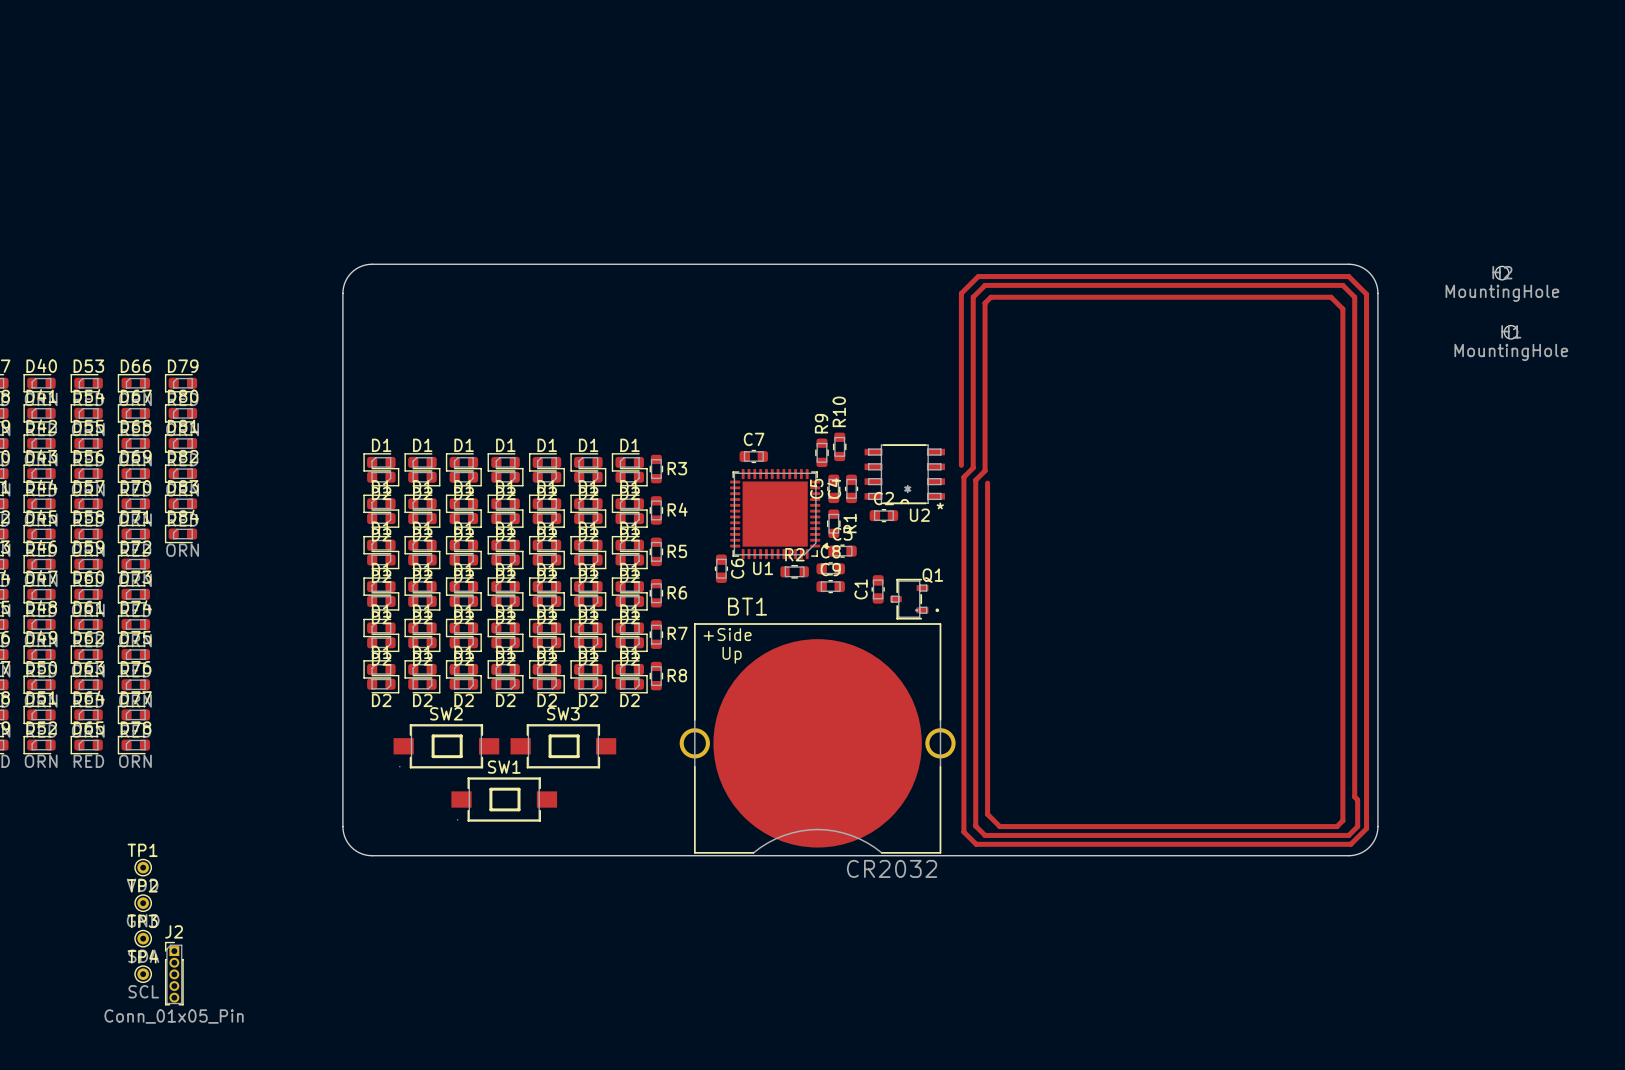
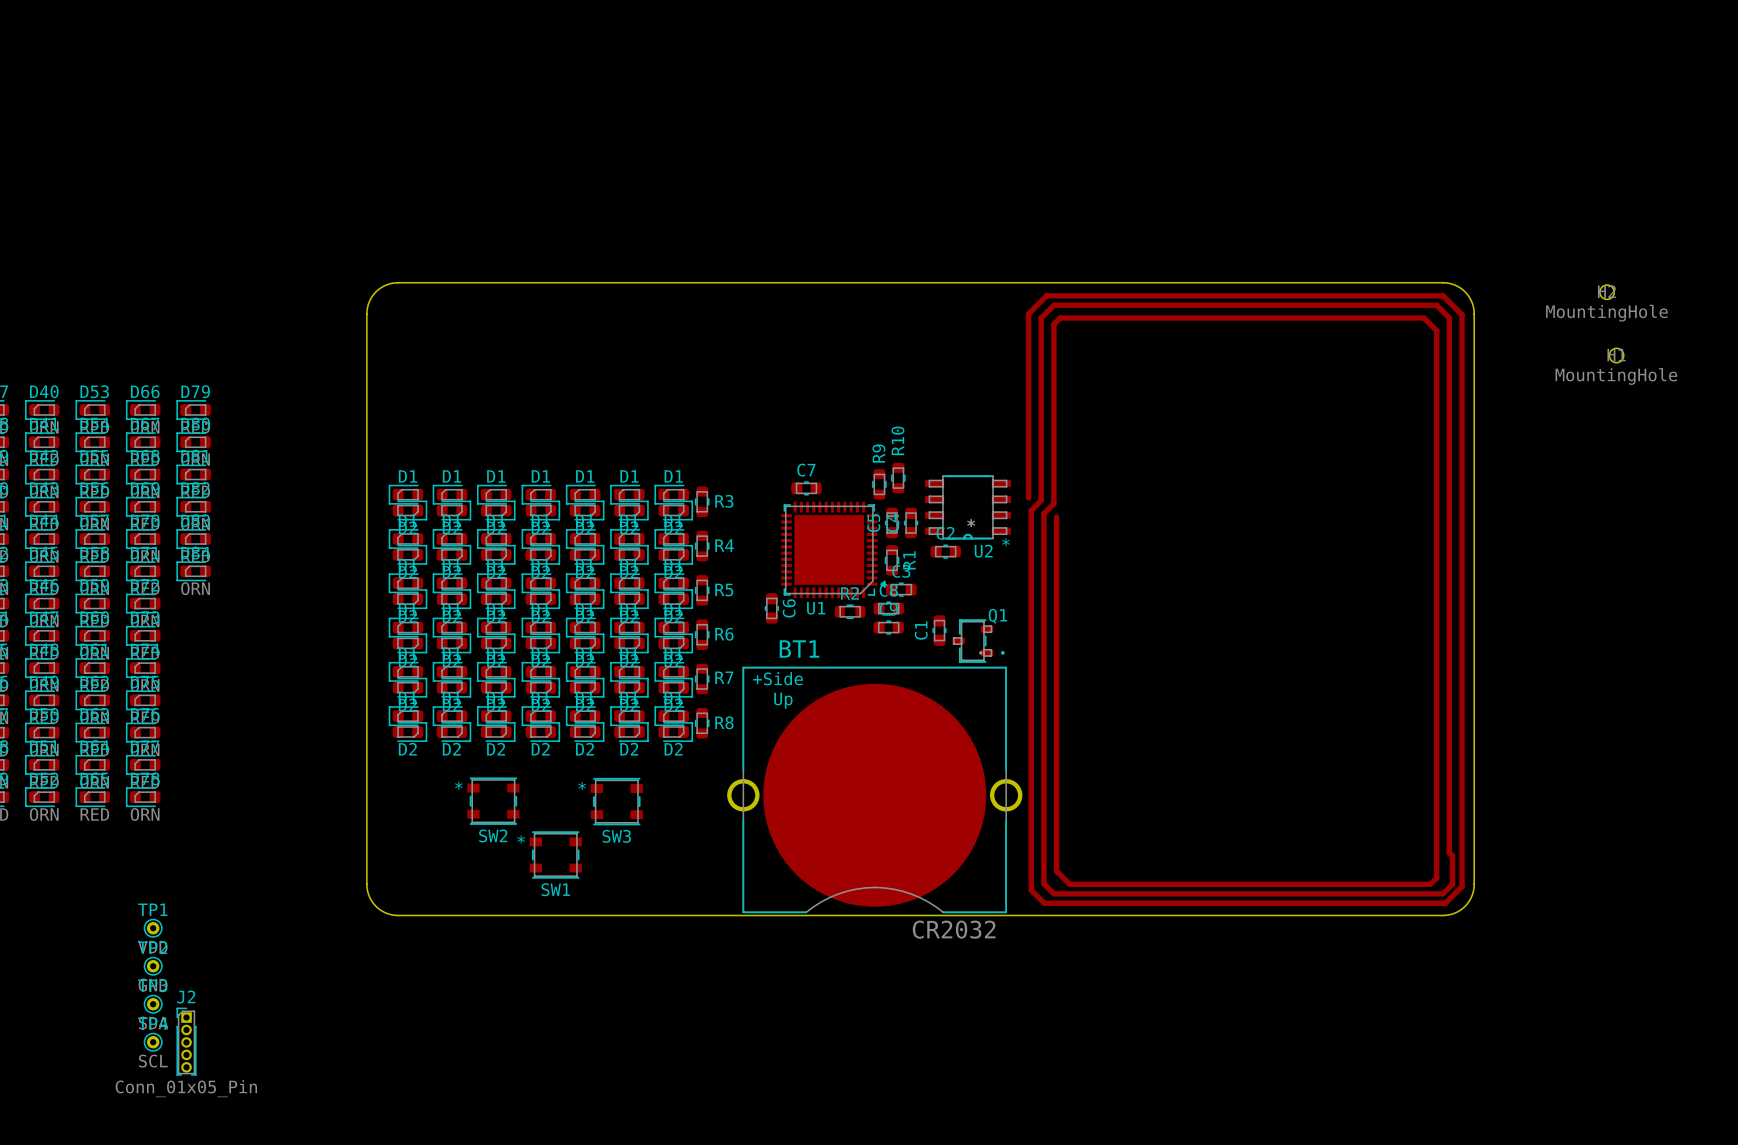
SW2 name position: SW2 (446, 713) -> SW2 (493, 835)
SW3 name position: SW3 (563, 713) -> SW3 (616, 836)
SW2 footprint: [393, 724, 500, 769] -> [467, 777, 520, 825]
SW3 footprint: [510, 724, 617, 769] -> [590, 777, 643, 826]
SW1 name position: SW1 (504, 767) -> SW1 (555, 889)
SW1 footprint: [451, 777, 558, 822] -> [529, 831, 582, 879]

